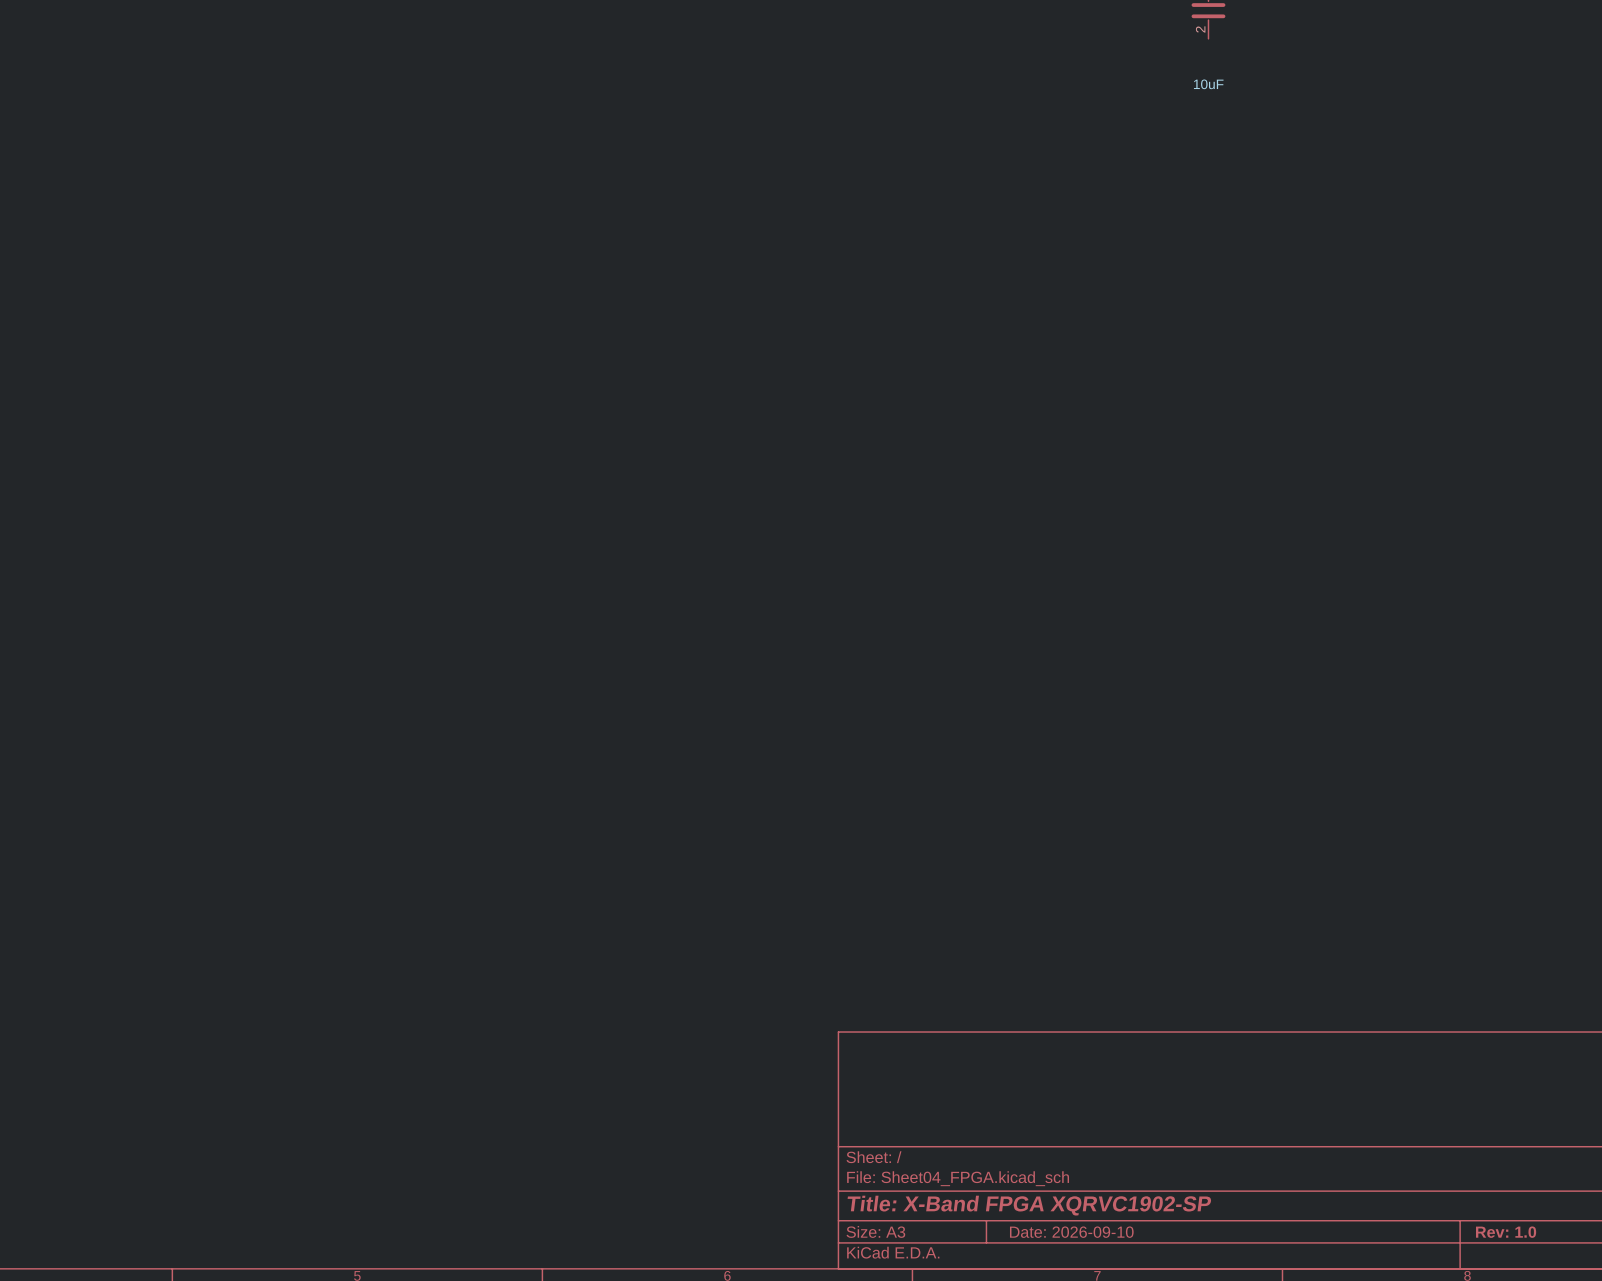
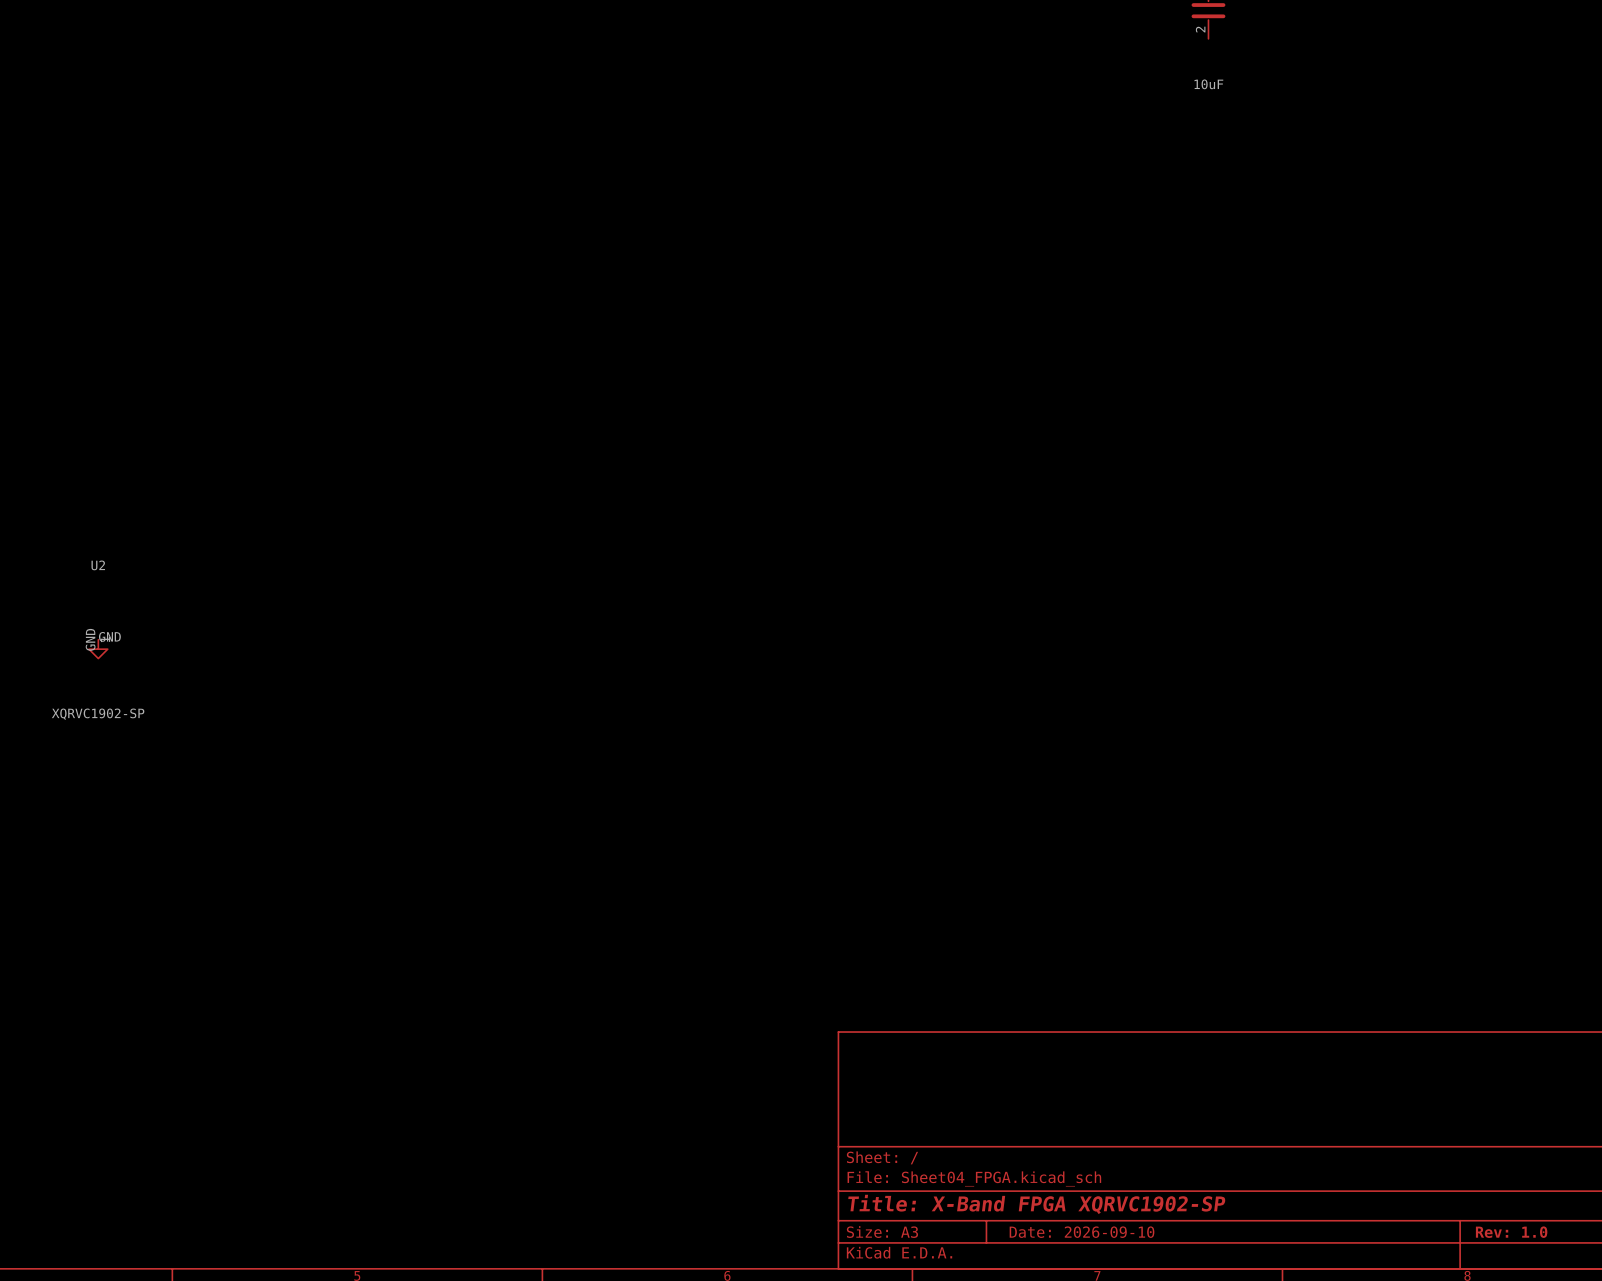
label: none -> GND (109, 636)
U2: none -> XQRVC1902-SP (98, 649)

